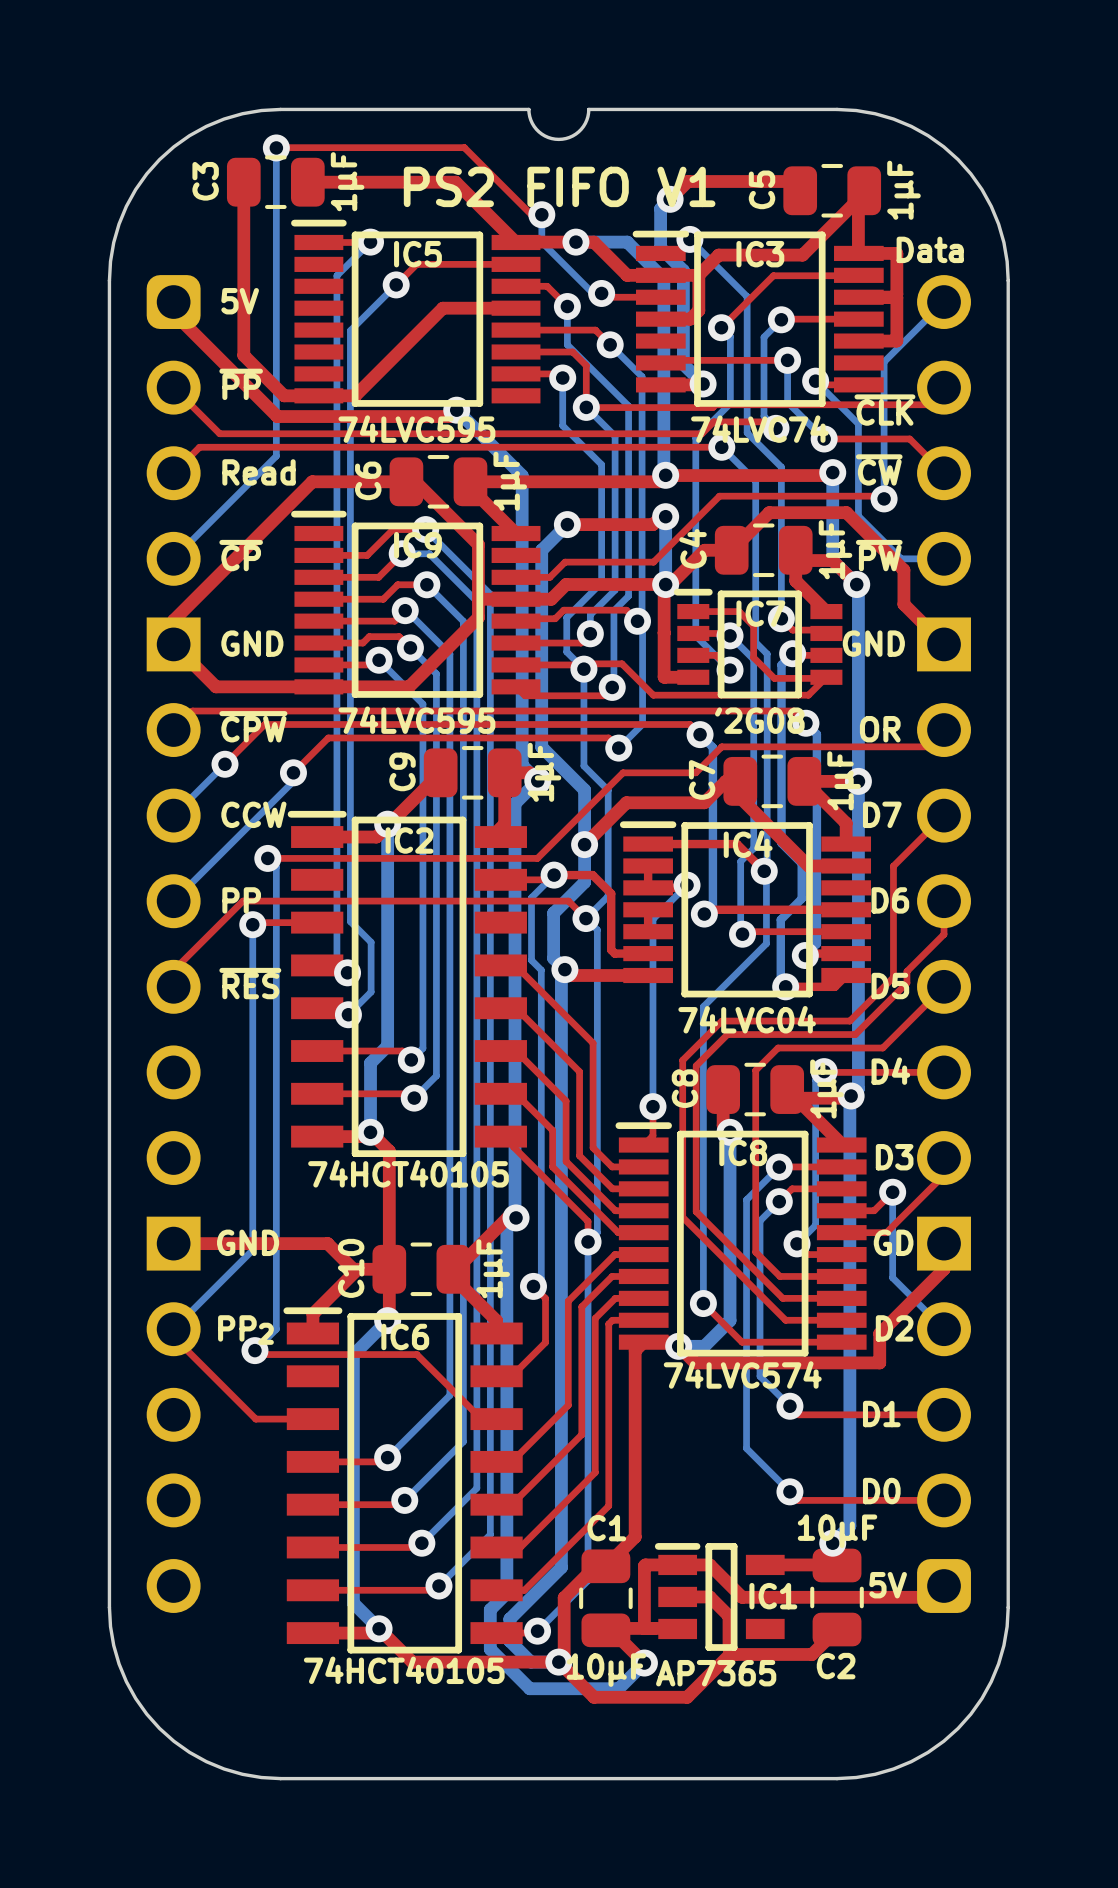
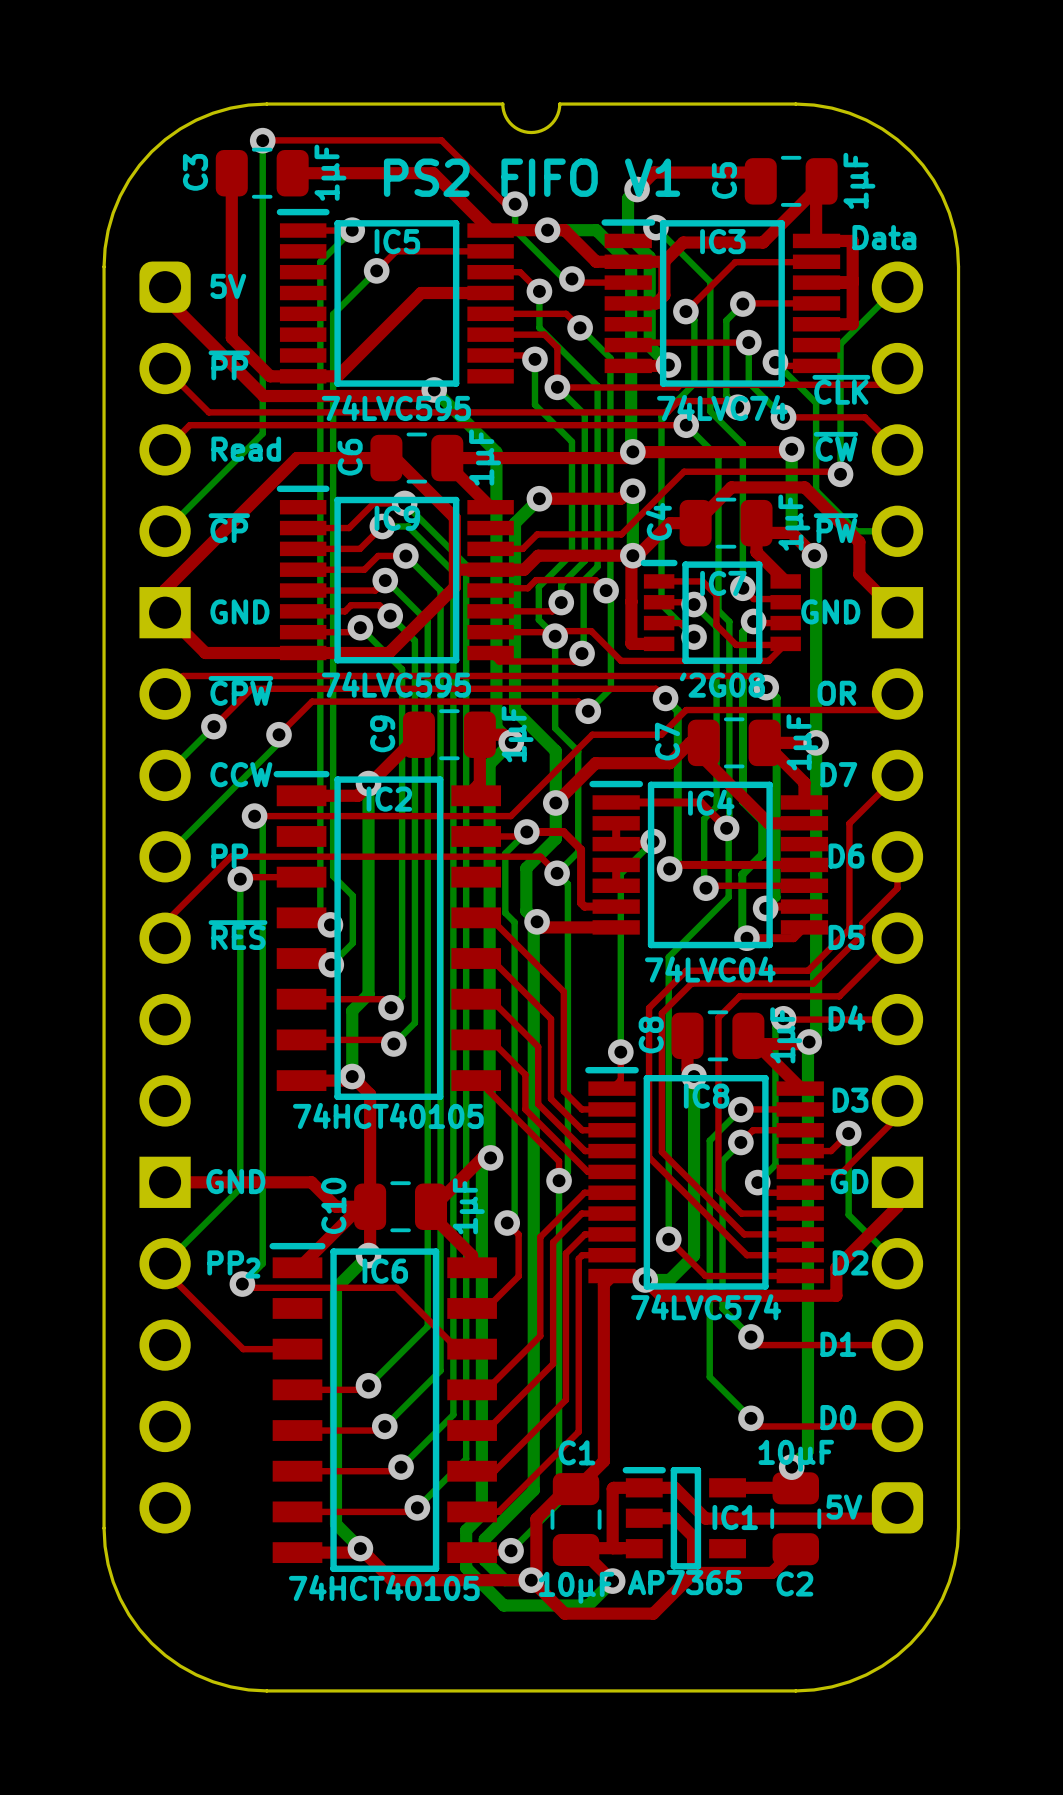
top track: (357, 1269) (312, 1314) (312, 1333) -> none
top track: none -> (360, 1206) (299, 1267)
IC1 text: none -> AP7365 (684, 1582)
IC1 text: AP7365 (716, 1673) -> none

